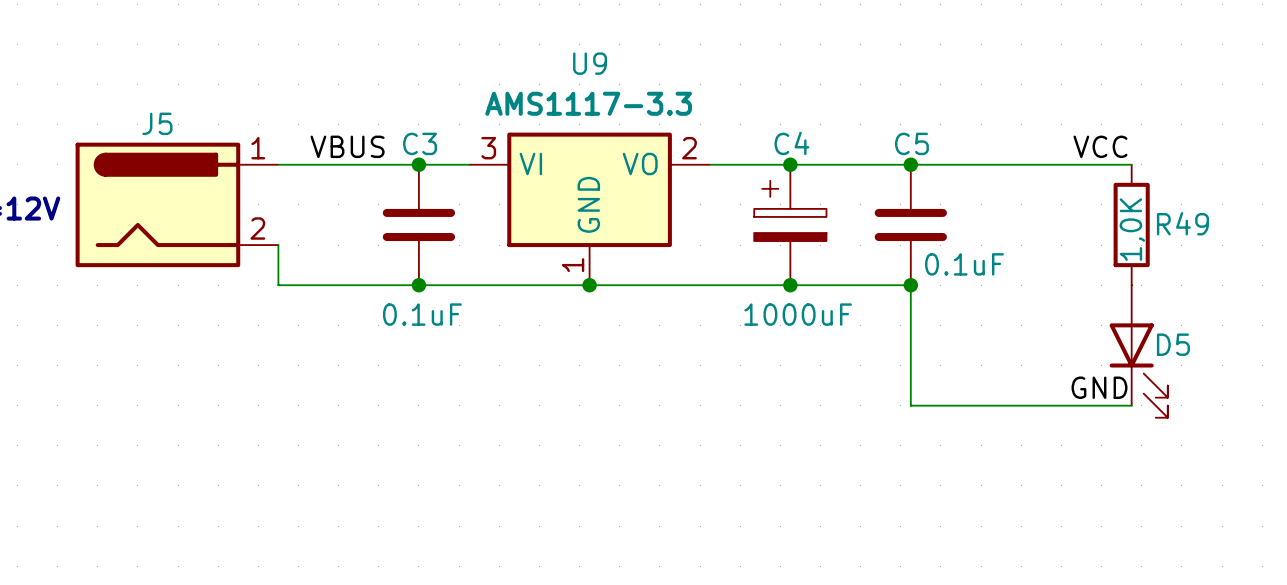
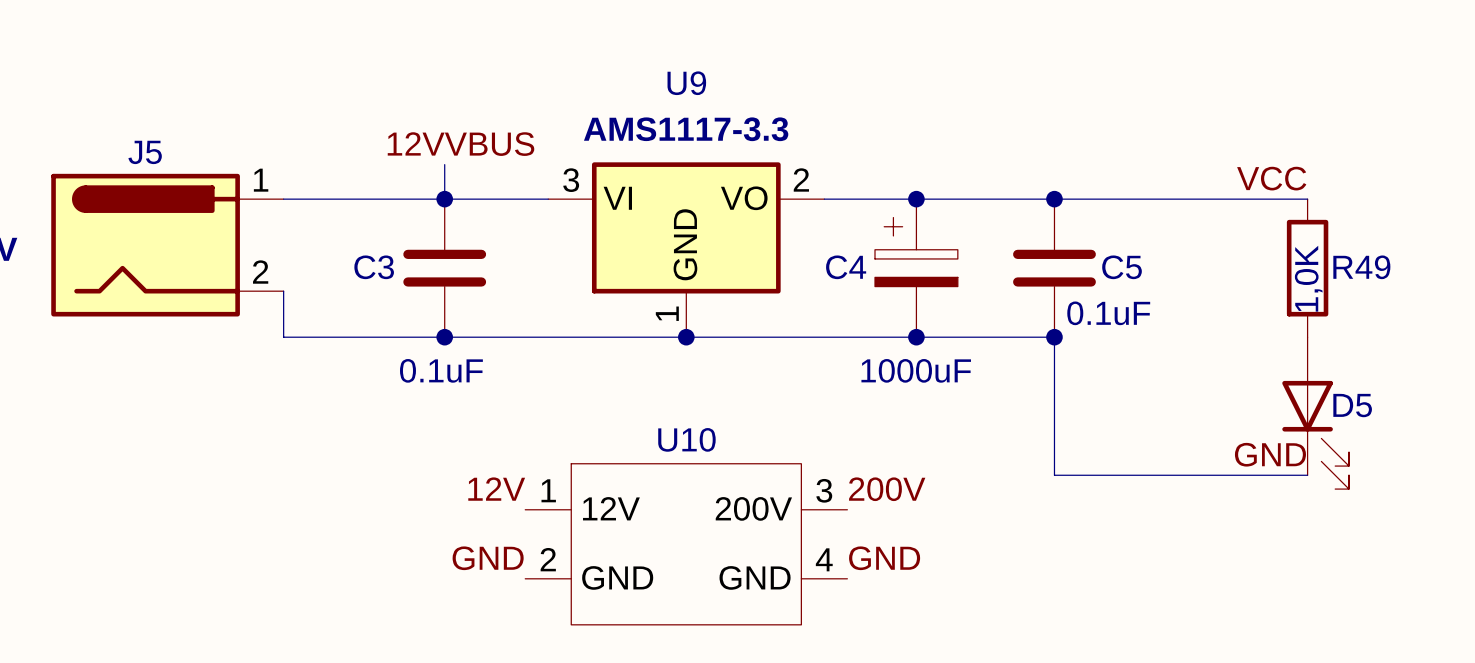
label: none -> 12V (416, 143)
wire: none -> (444, 164) (444, 199)
C3 name position: C3 (420, 143) -> C3 (374, 267)
C4 name position: C4 (791, 143) -> C4 (846, 267)
C5 name position: C5 (911, 143) -> C5 (1122, 267)
label position: VBUS (347, 146) -> VBUS (489, 144)
label position: VCC (1100, 146) -> VCC (1271, 178)
junction: (790, 164) -> none
junction: none -> (916, 199)
junction: (910, 164) -> none
junction: none -> (1054, 199)
wire: none -> (1261, 199) (1307, 199)
U9 position: (589, 208) -> (686, 249)
C4 position: (790, 224) -> (916, 268)
C5 position: (910, 224) -> (1054, 268)
R49 position: (1131, 224) -> (1307, 268)
junction position: (589, 285) -> (686, 337)
junction: (790, 285) -> none
junction: none -> (916, 337)
wire: (910, 285) (910, 405) (950, 405) -> (1008, 337) (1054, 337) (1054, 475)
junction: (910, 285) -> none
junction: none -> (1054, 337)
D5 position: (1138, 351) -> (1315, 413)
label position: GND (1099, 387) -> GND (1270, 454)
wire: none -> (1261, 475) (1307, 475)
label: none -> 12V (496, 489)
label: none -> 200V (887, 489)
U10: none -> (686, 544)
label: none -> GND (488, 558)
label: none -> GND (884, 558)

